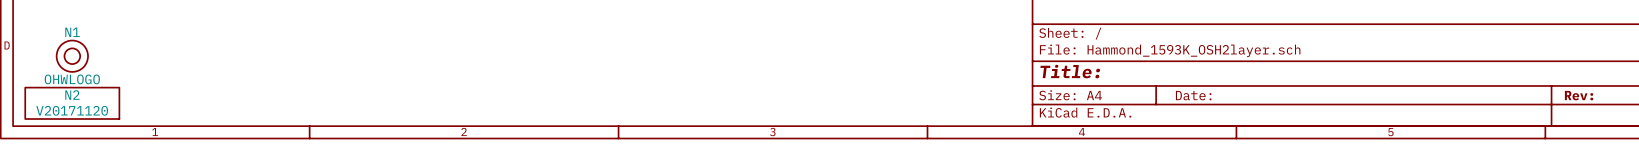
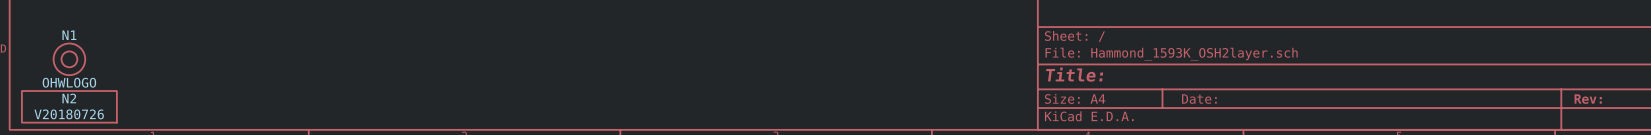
N2 value: V20171120 (72, 110) -> V20180726 (69, 114)

